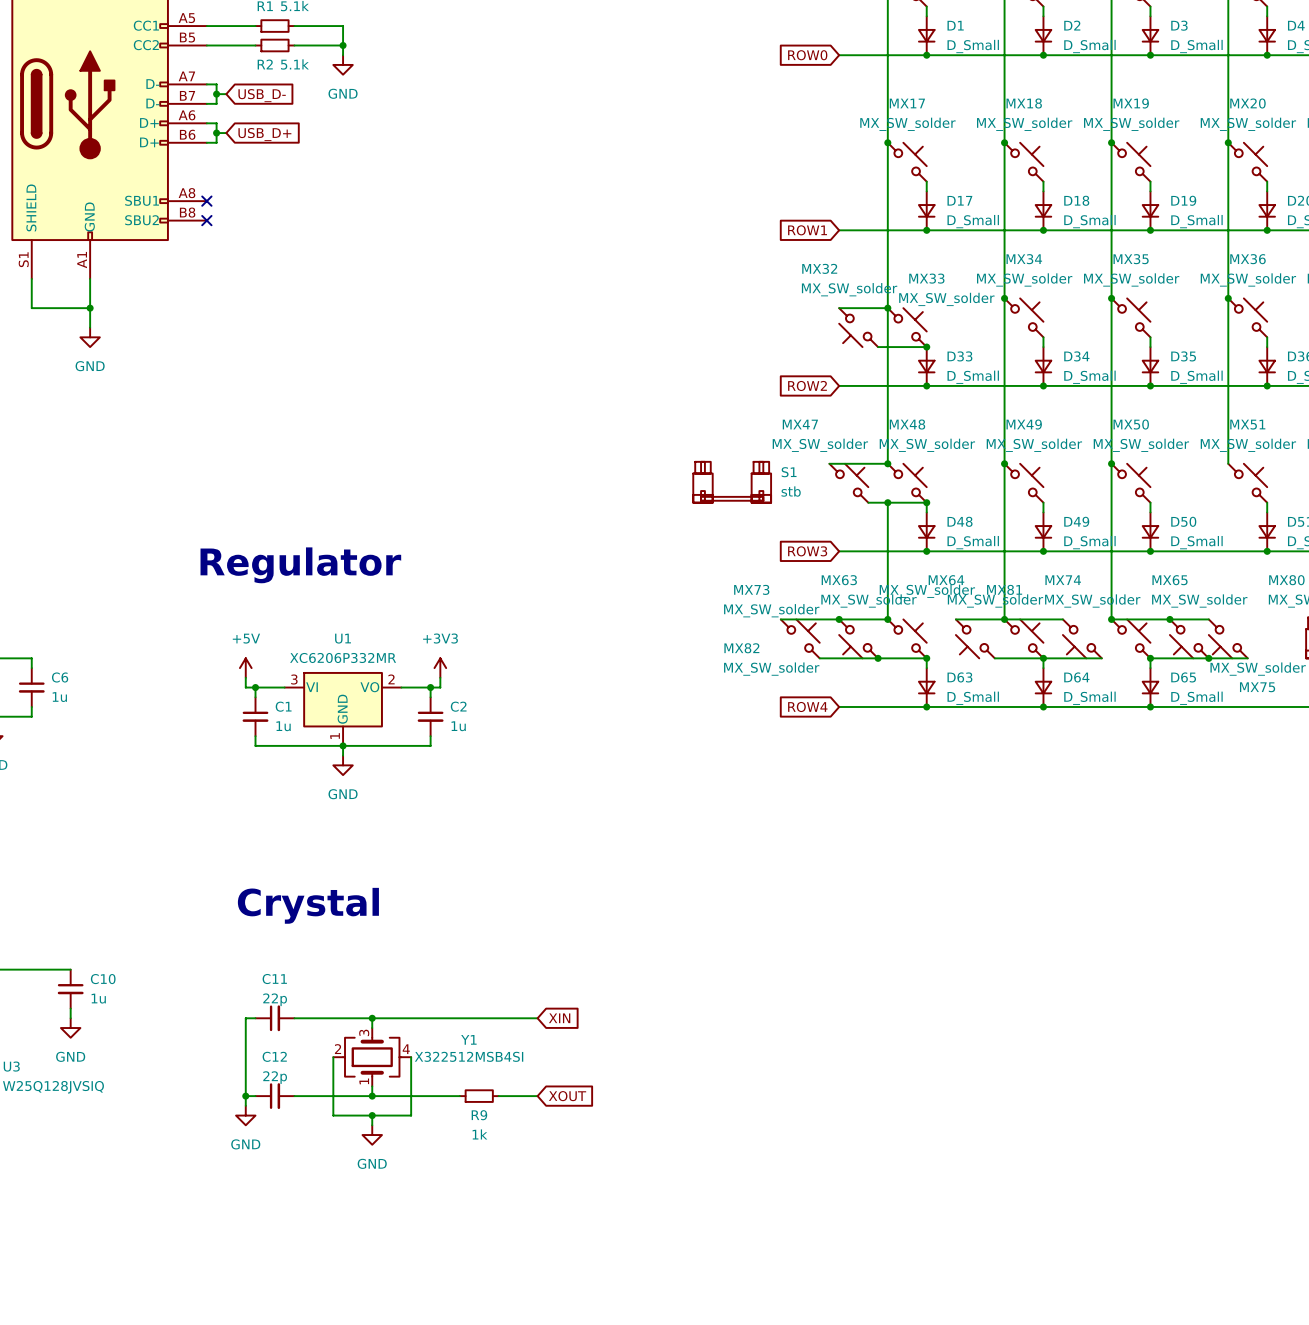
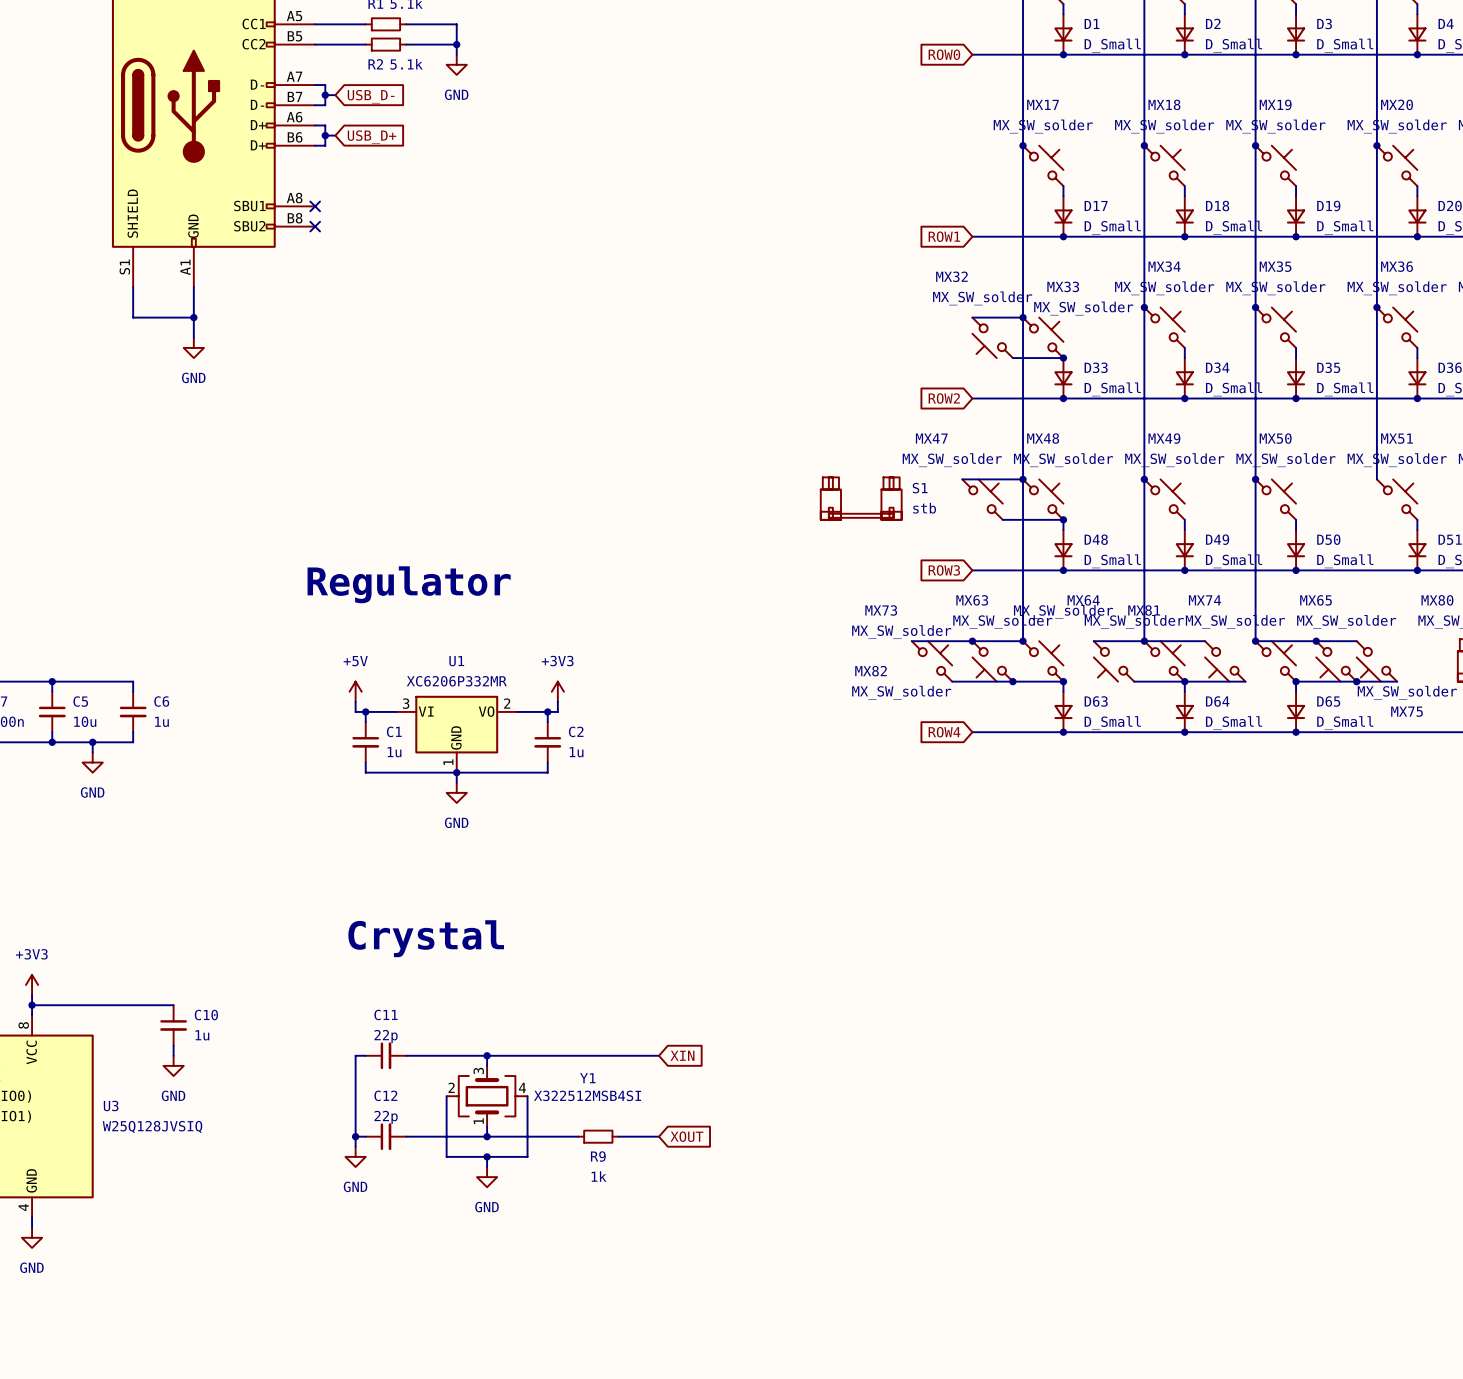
wire: none -> (1023, 479) (1023, 519)
junction: (887, 502) -> none

